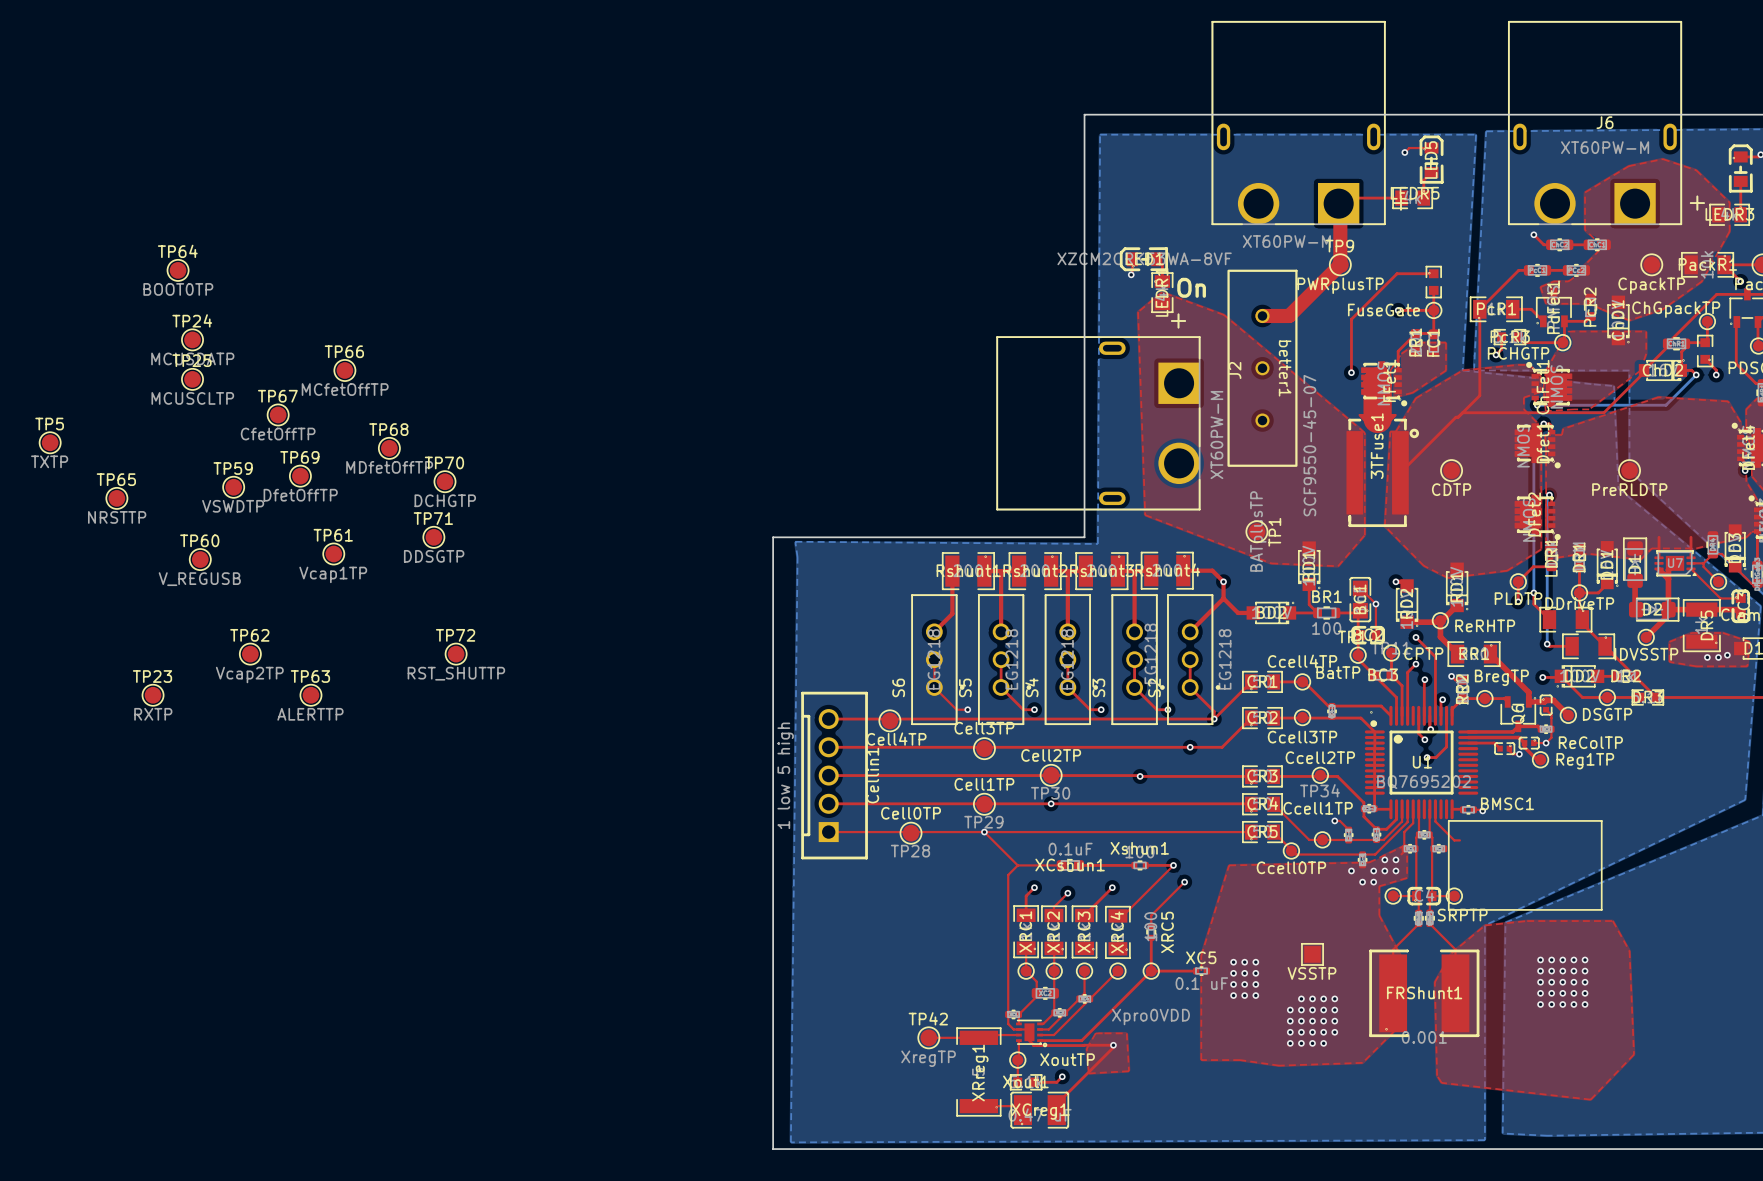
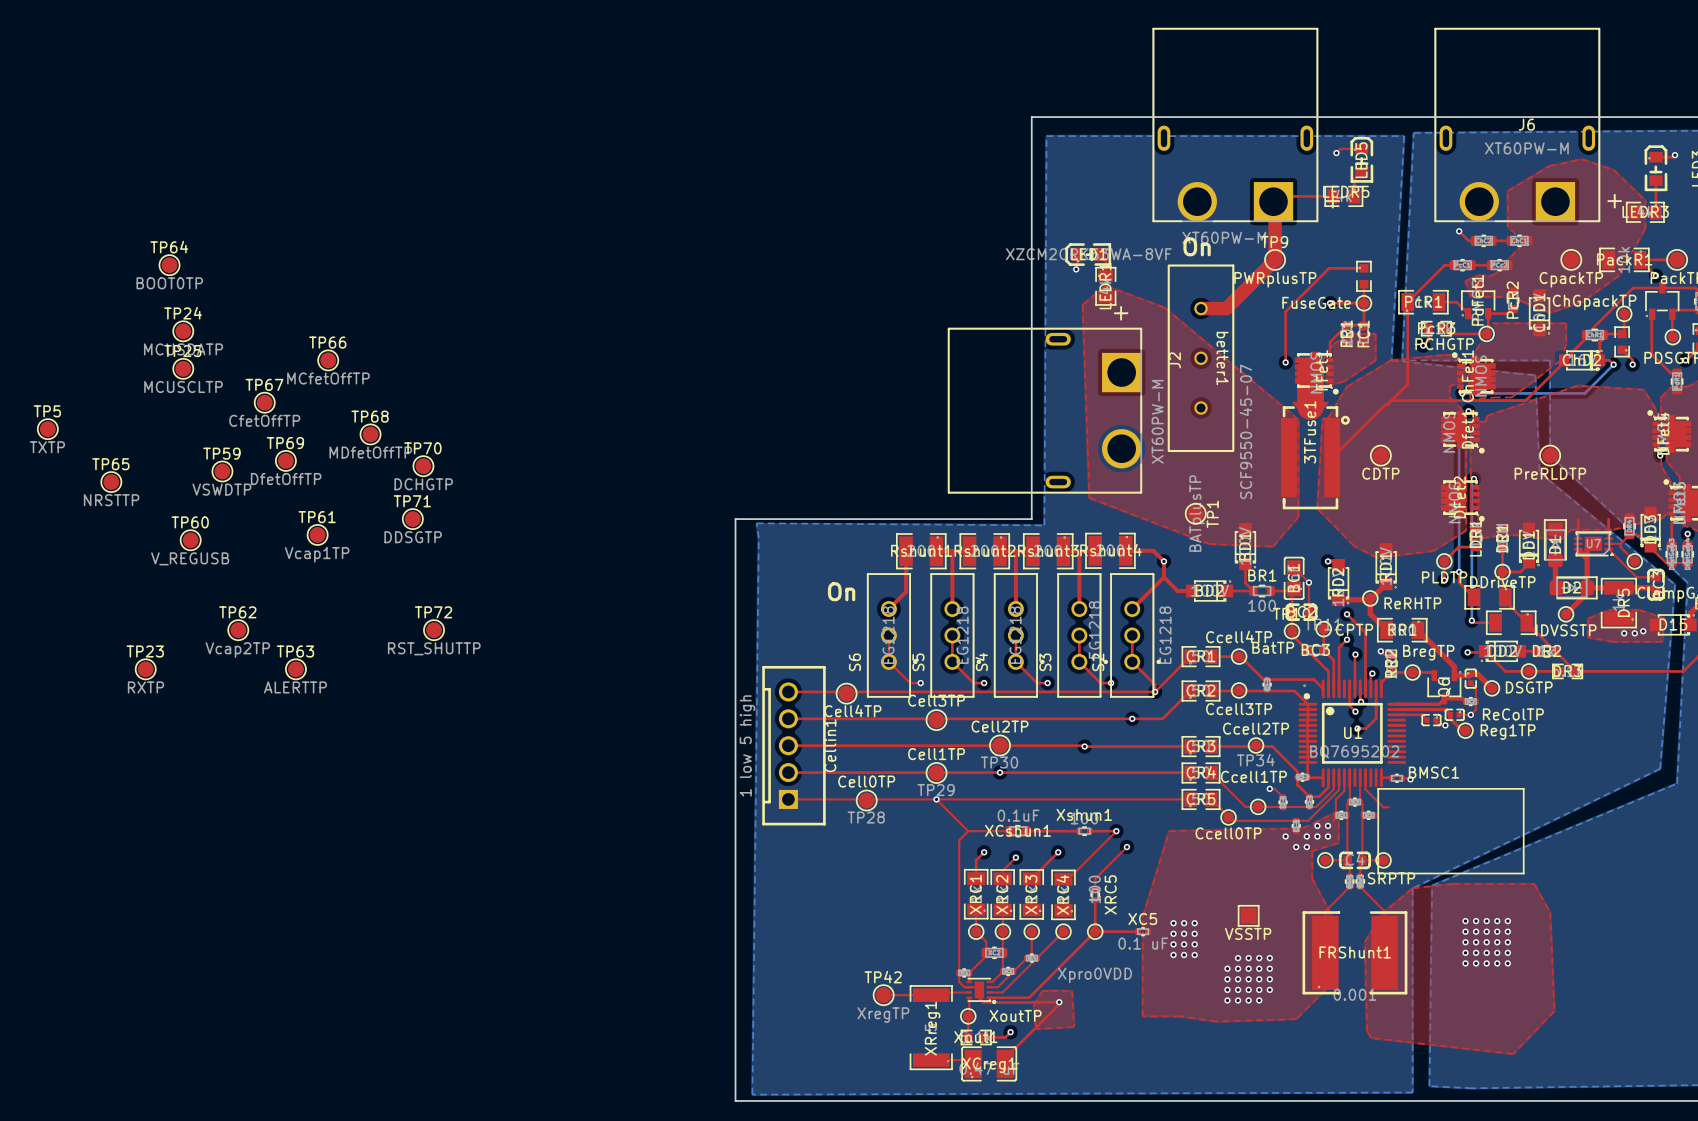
text position: On (1191, 287) -> On (1197, 246)
text: none -> On (841, 591)

